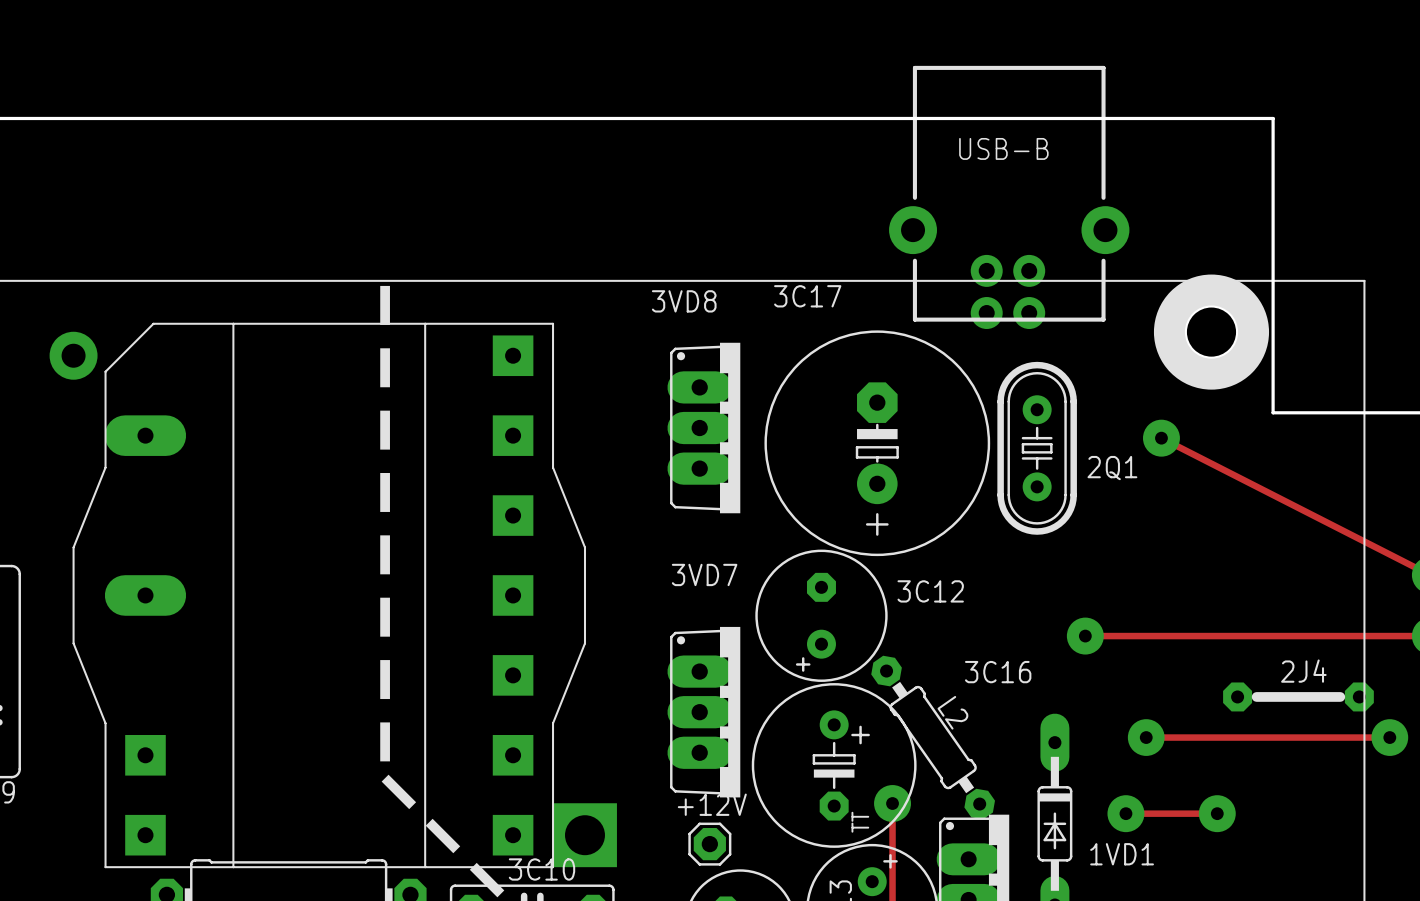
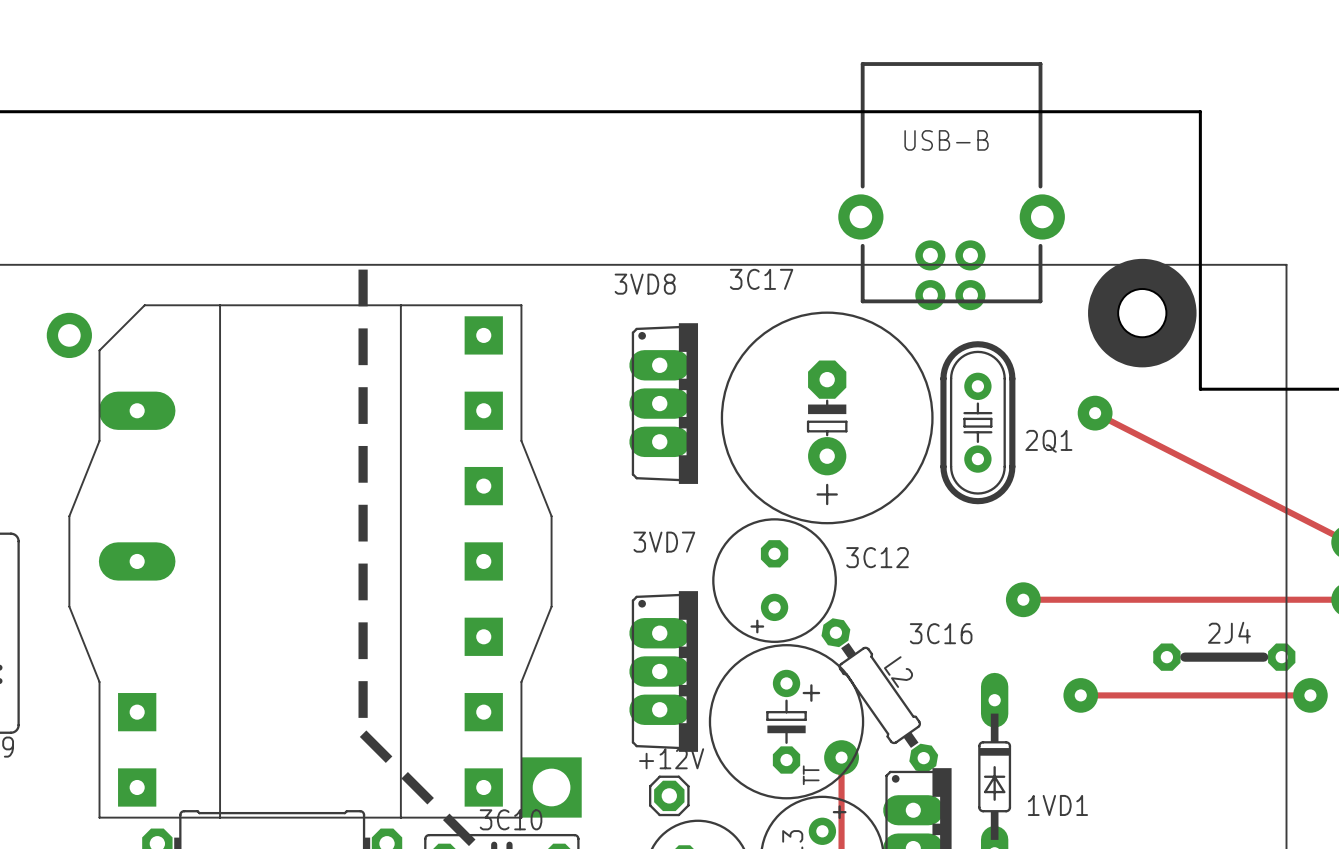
track: (1125, 813) (1217, 813) -> none
via: (1125, 813) -> none
via: (1217, 813) -> none

